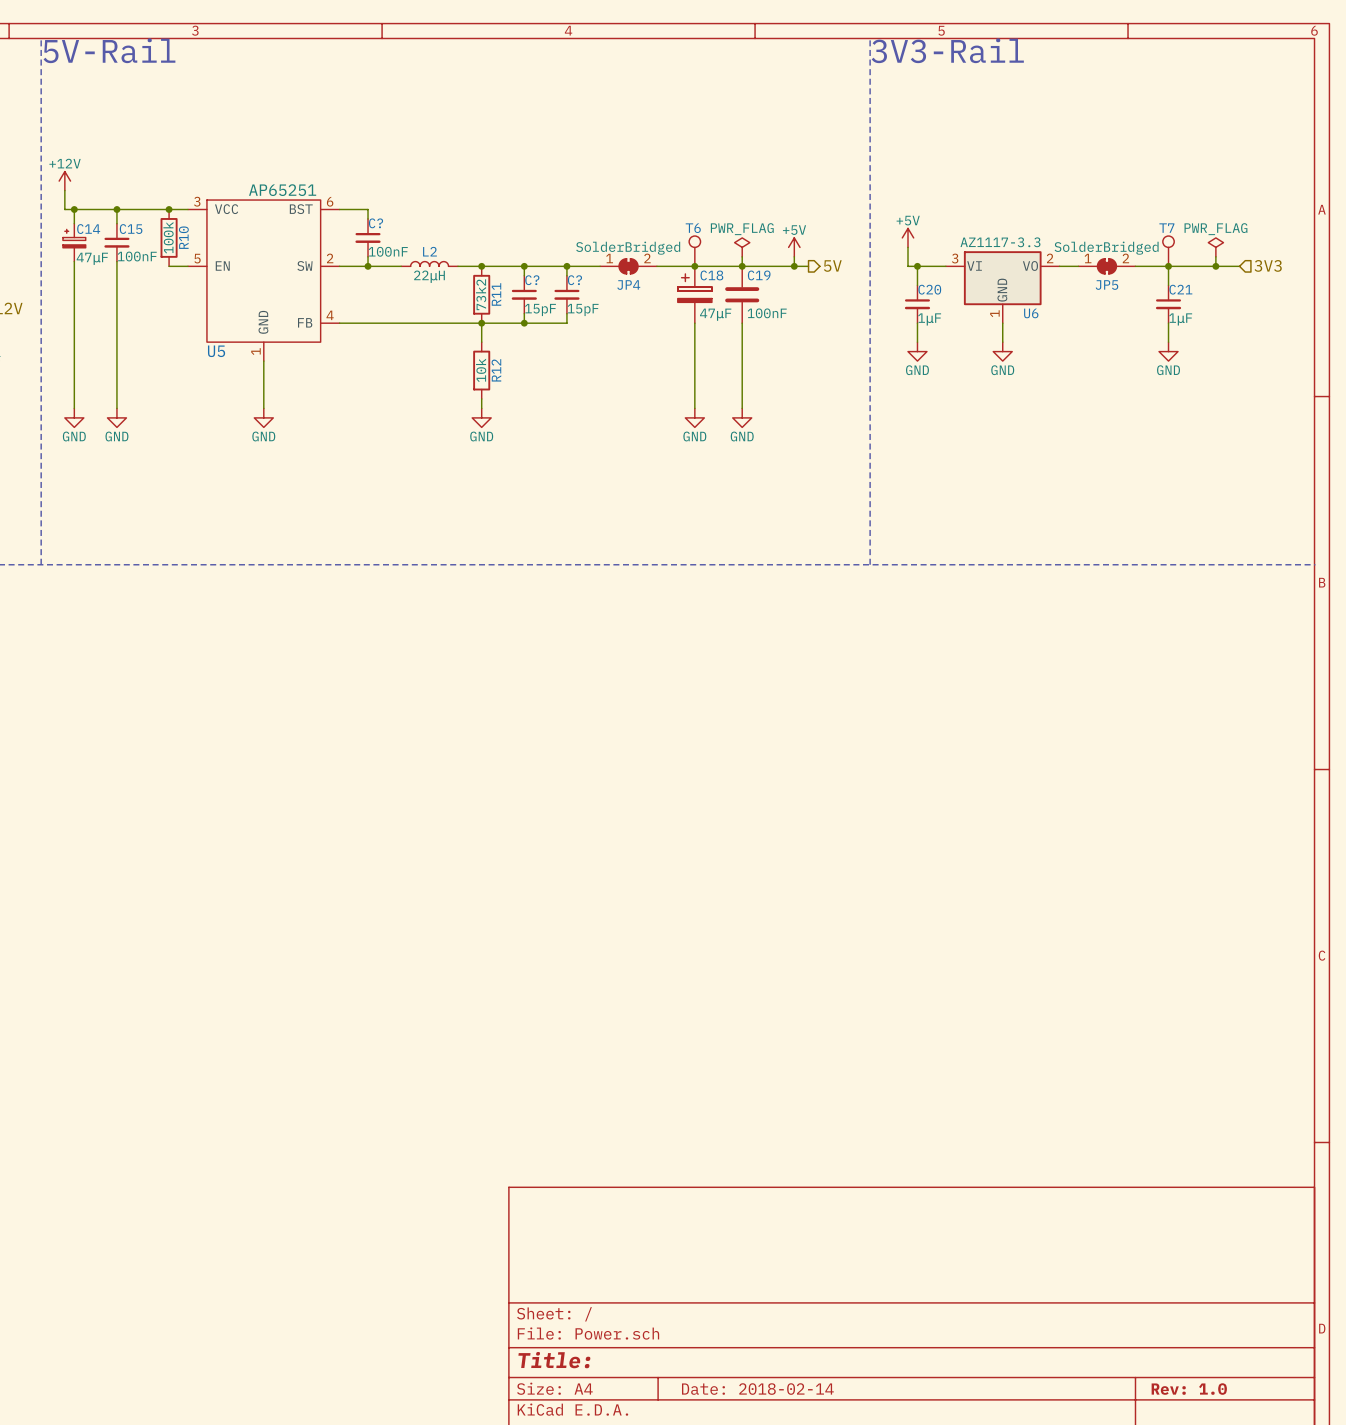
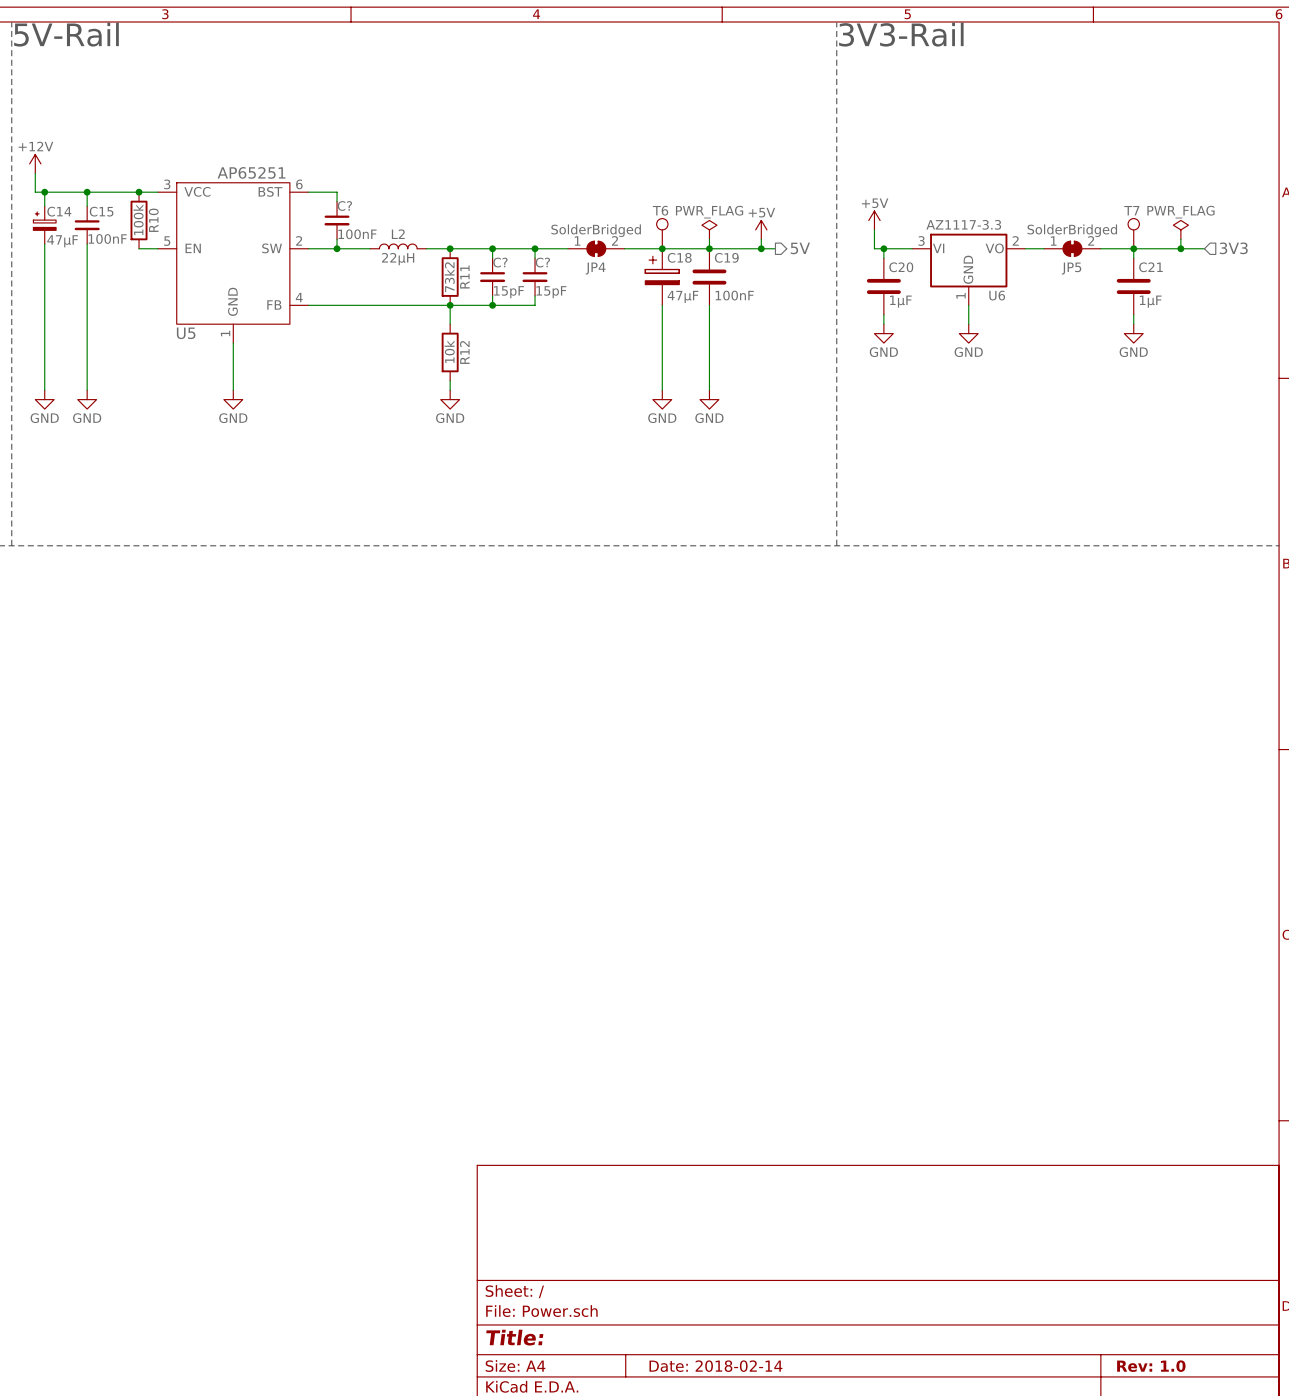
C20 symbol: [904, 285, 931, 324] -> [866, 258, 901, 315]
C21 symbol: [1155, 285, 1182, 324] -> [1116, 258, 1151, 315]

